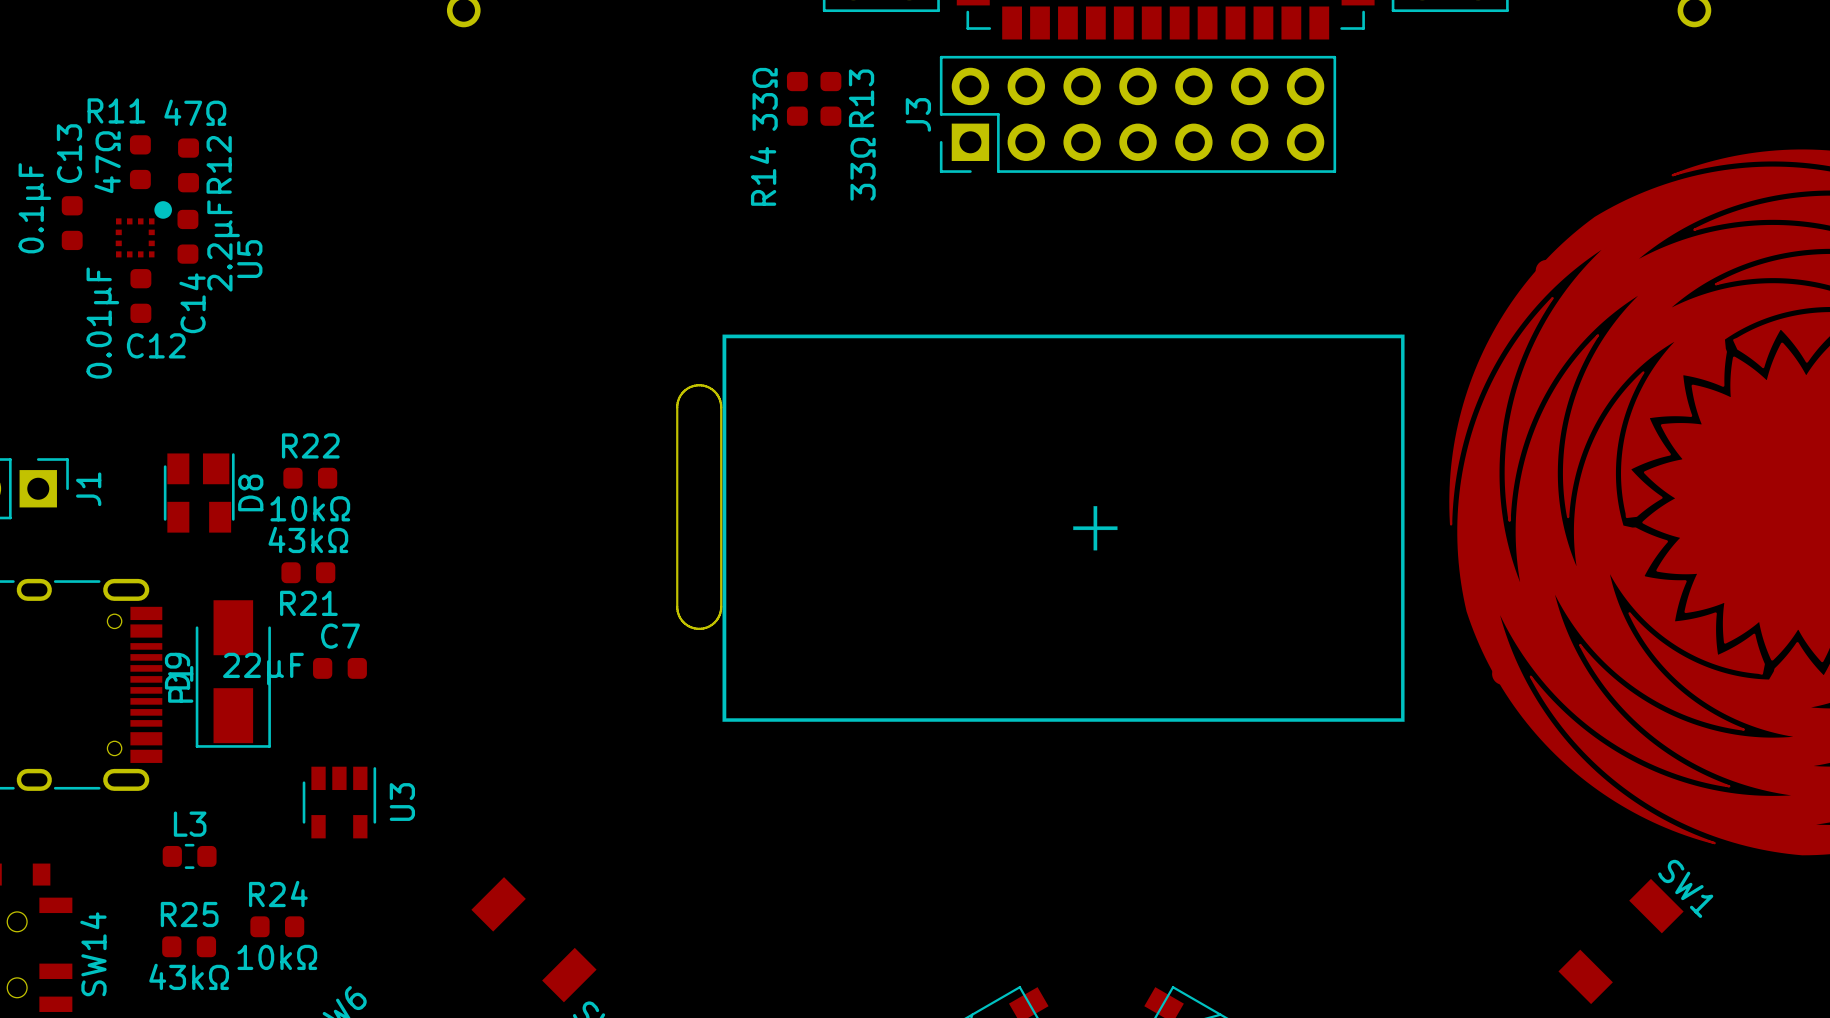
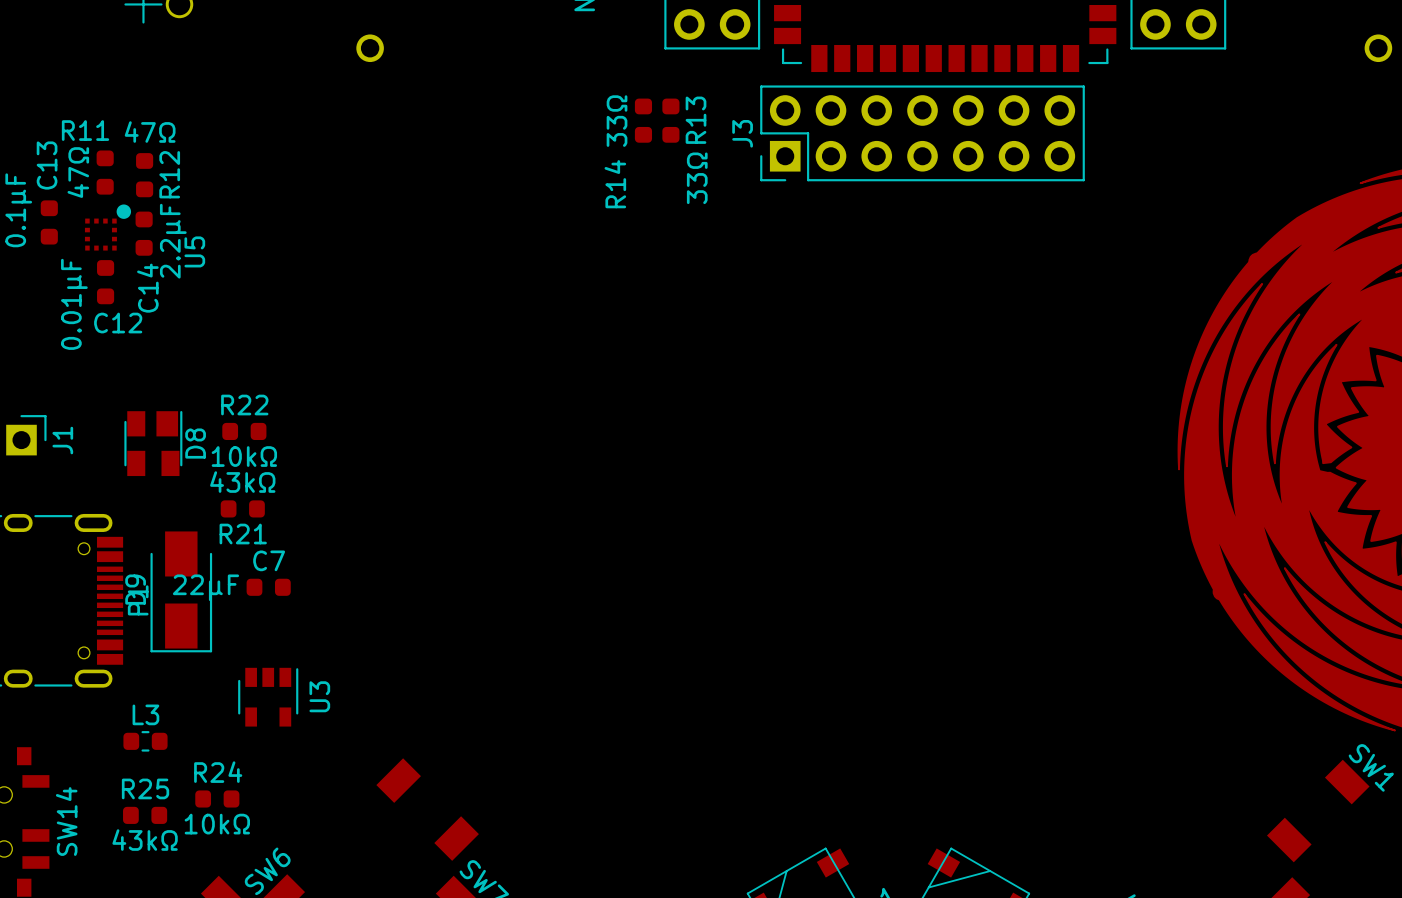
part: (1040, 528) -> none

